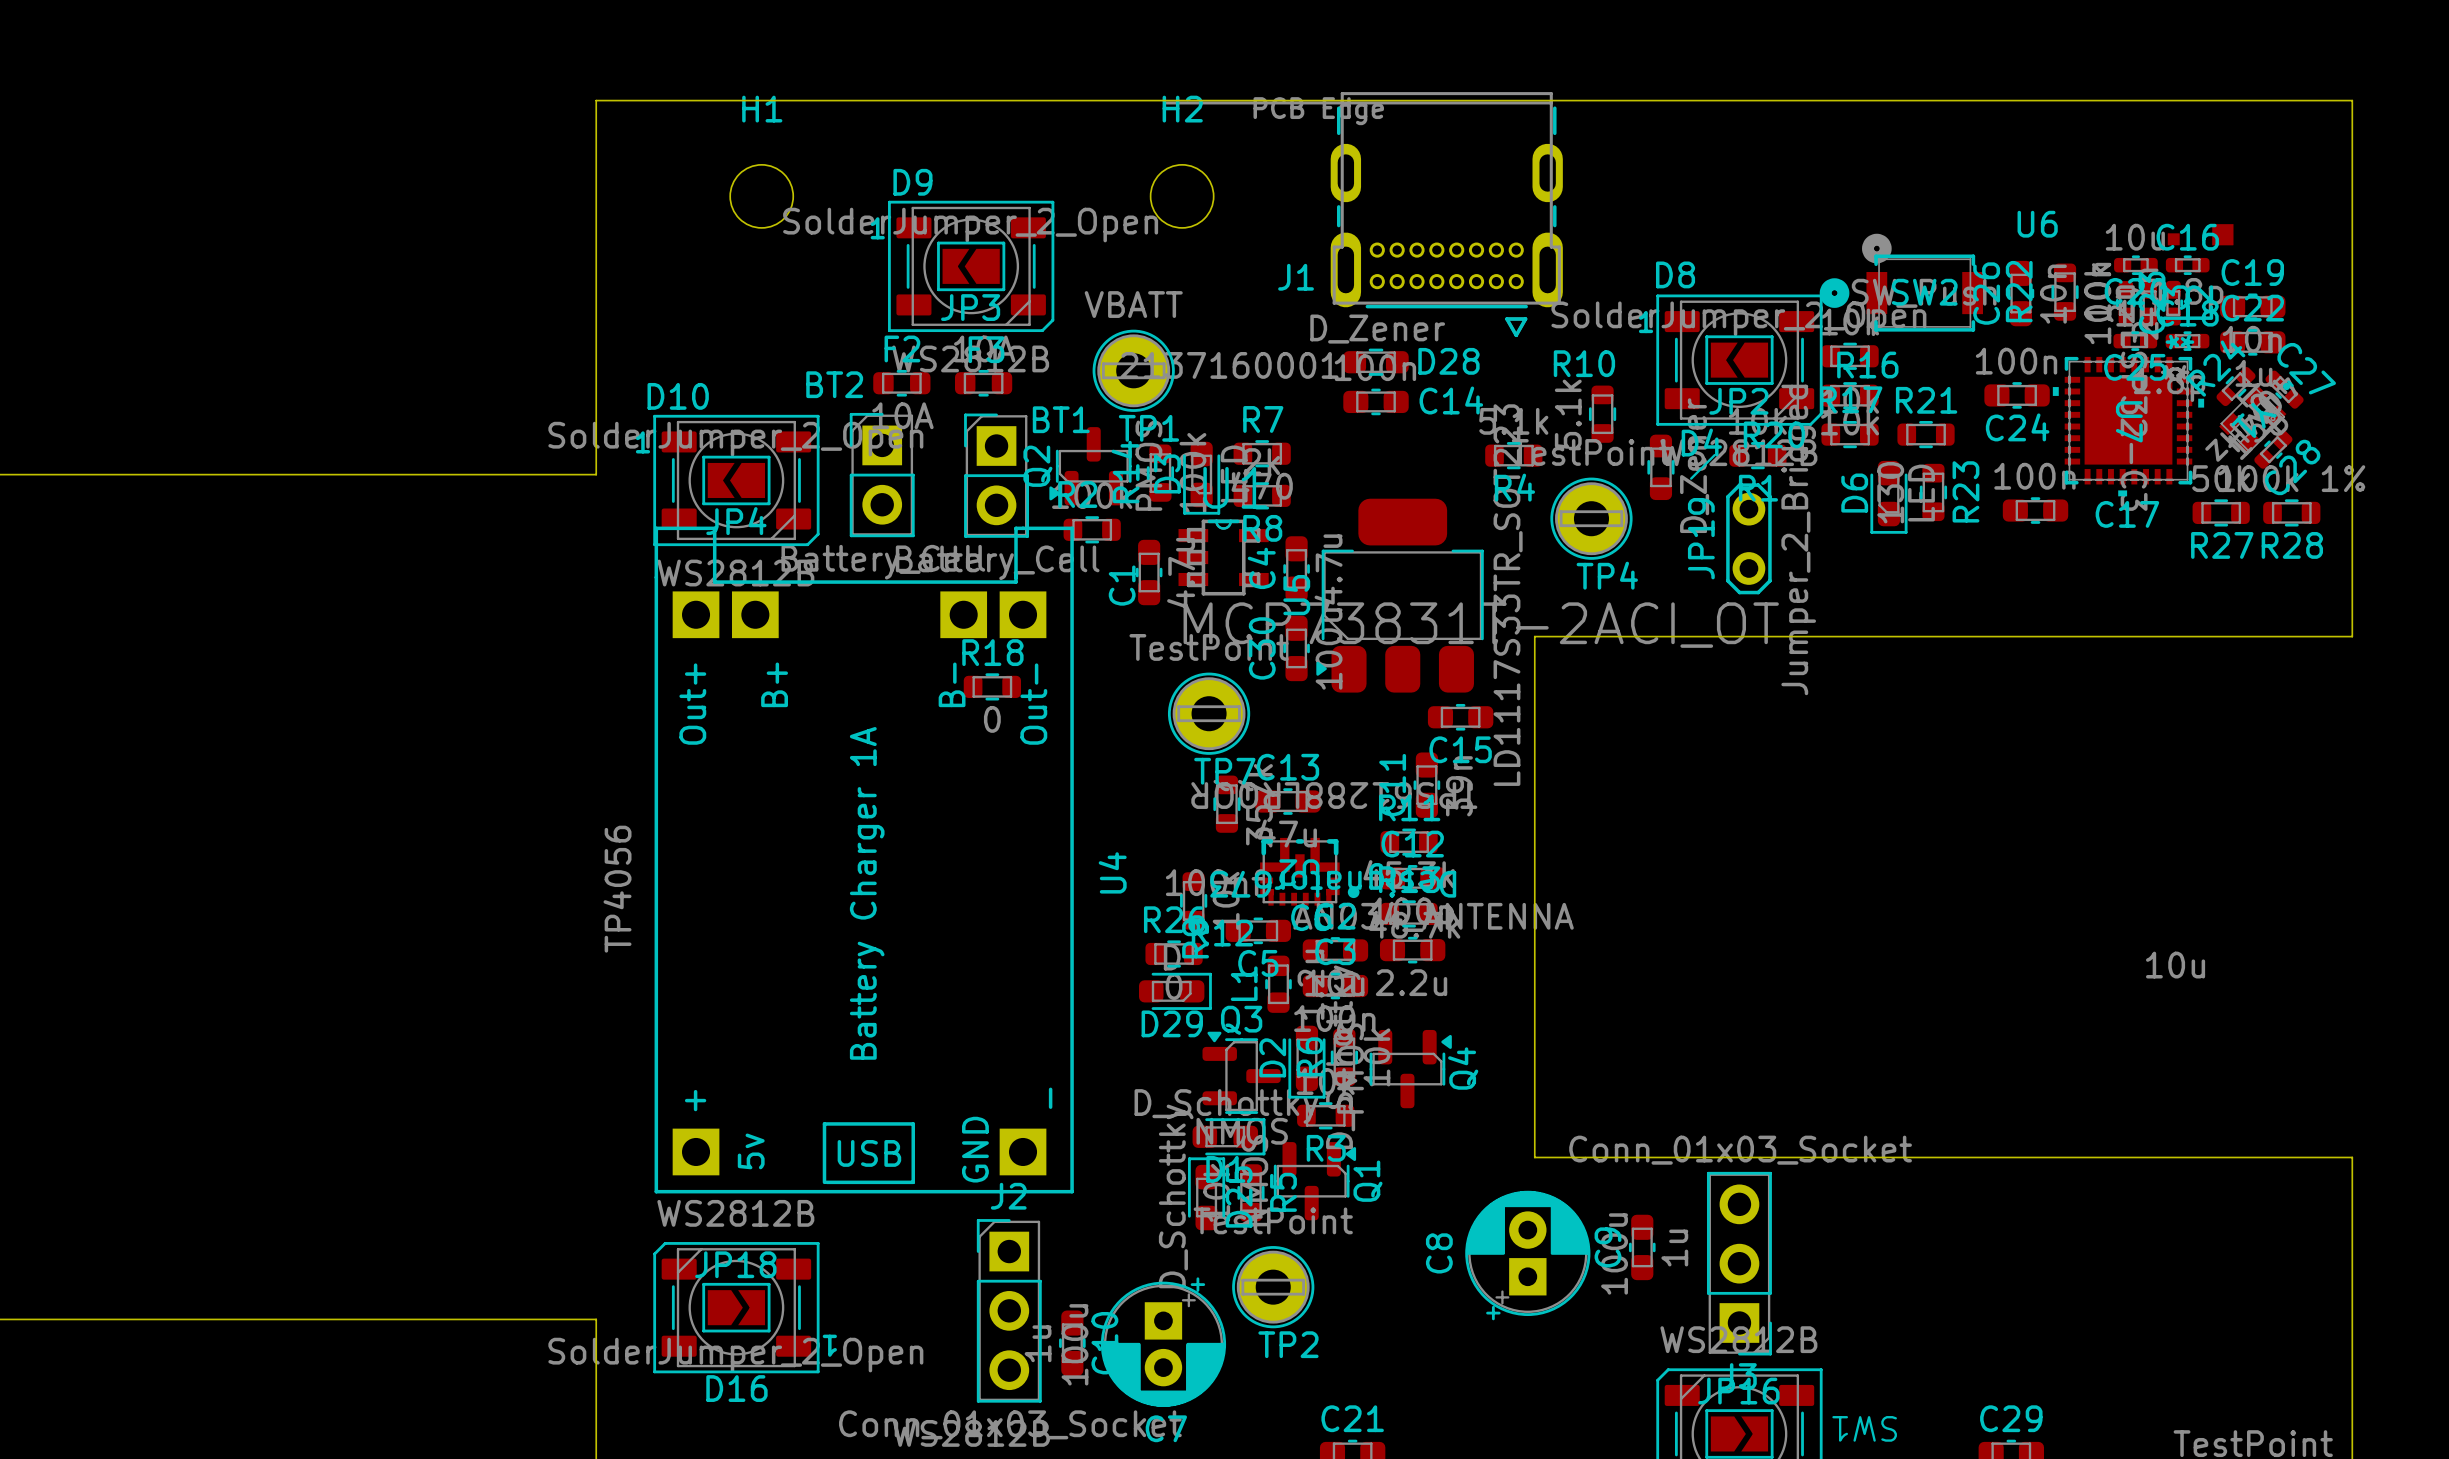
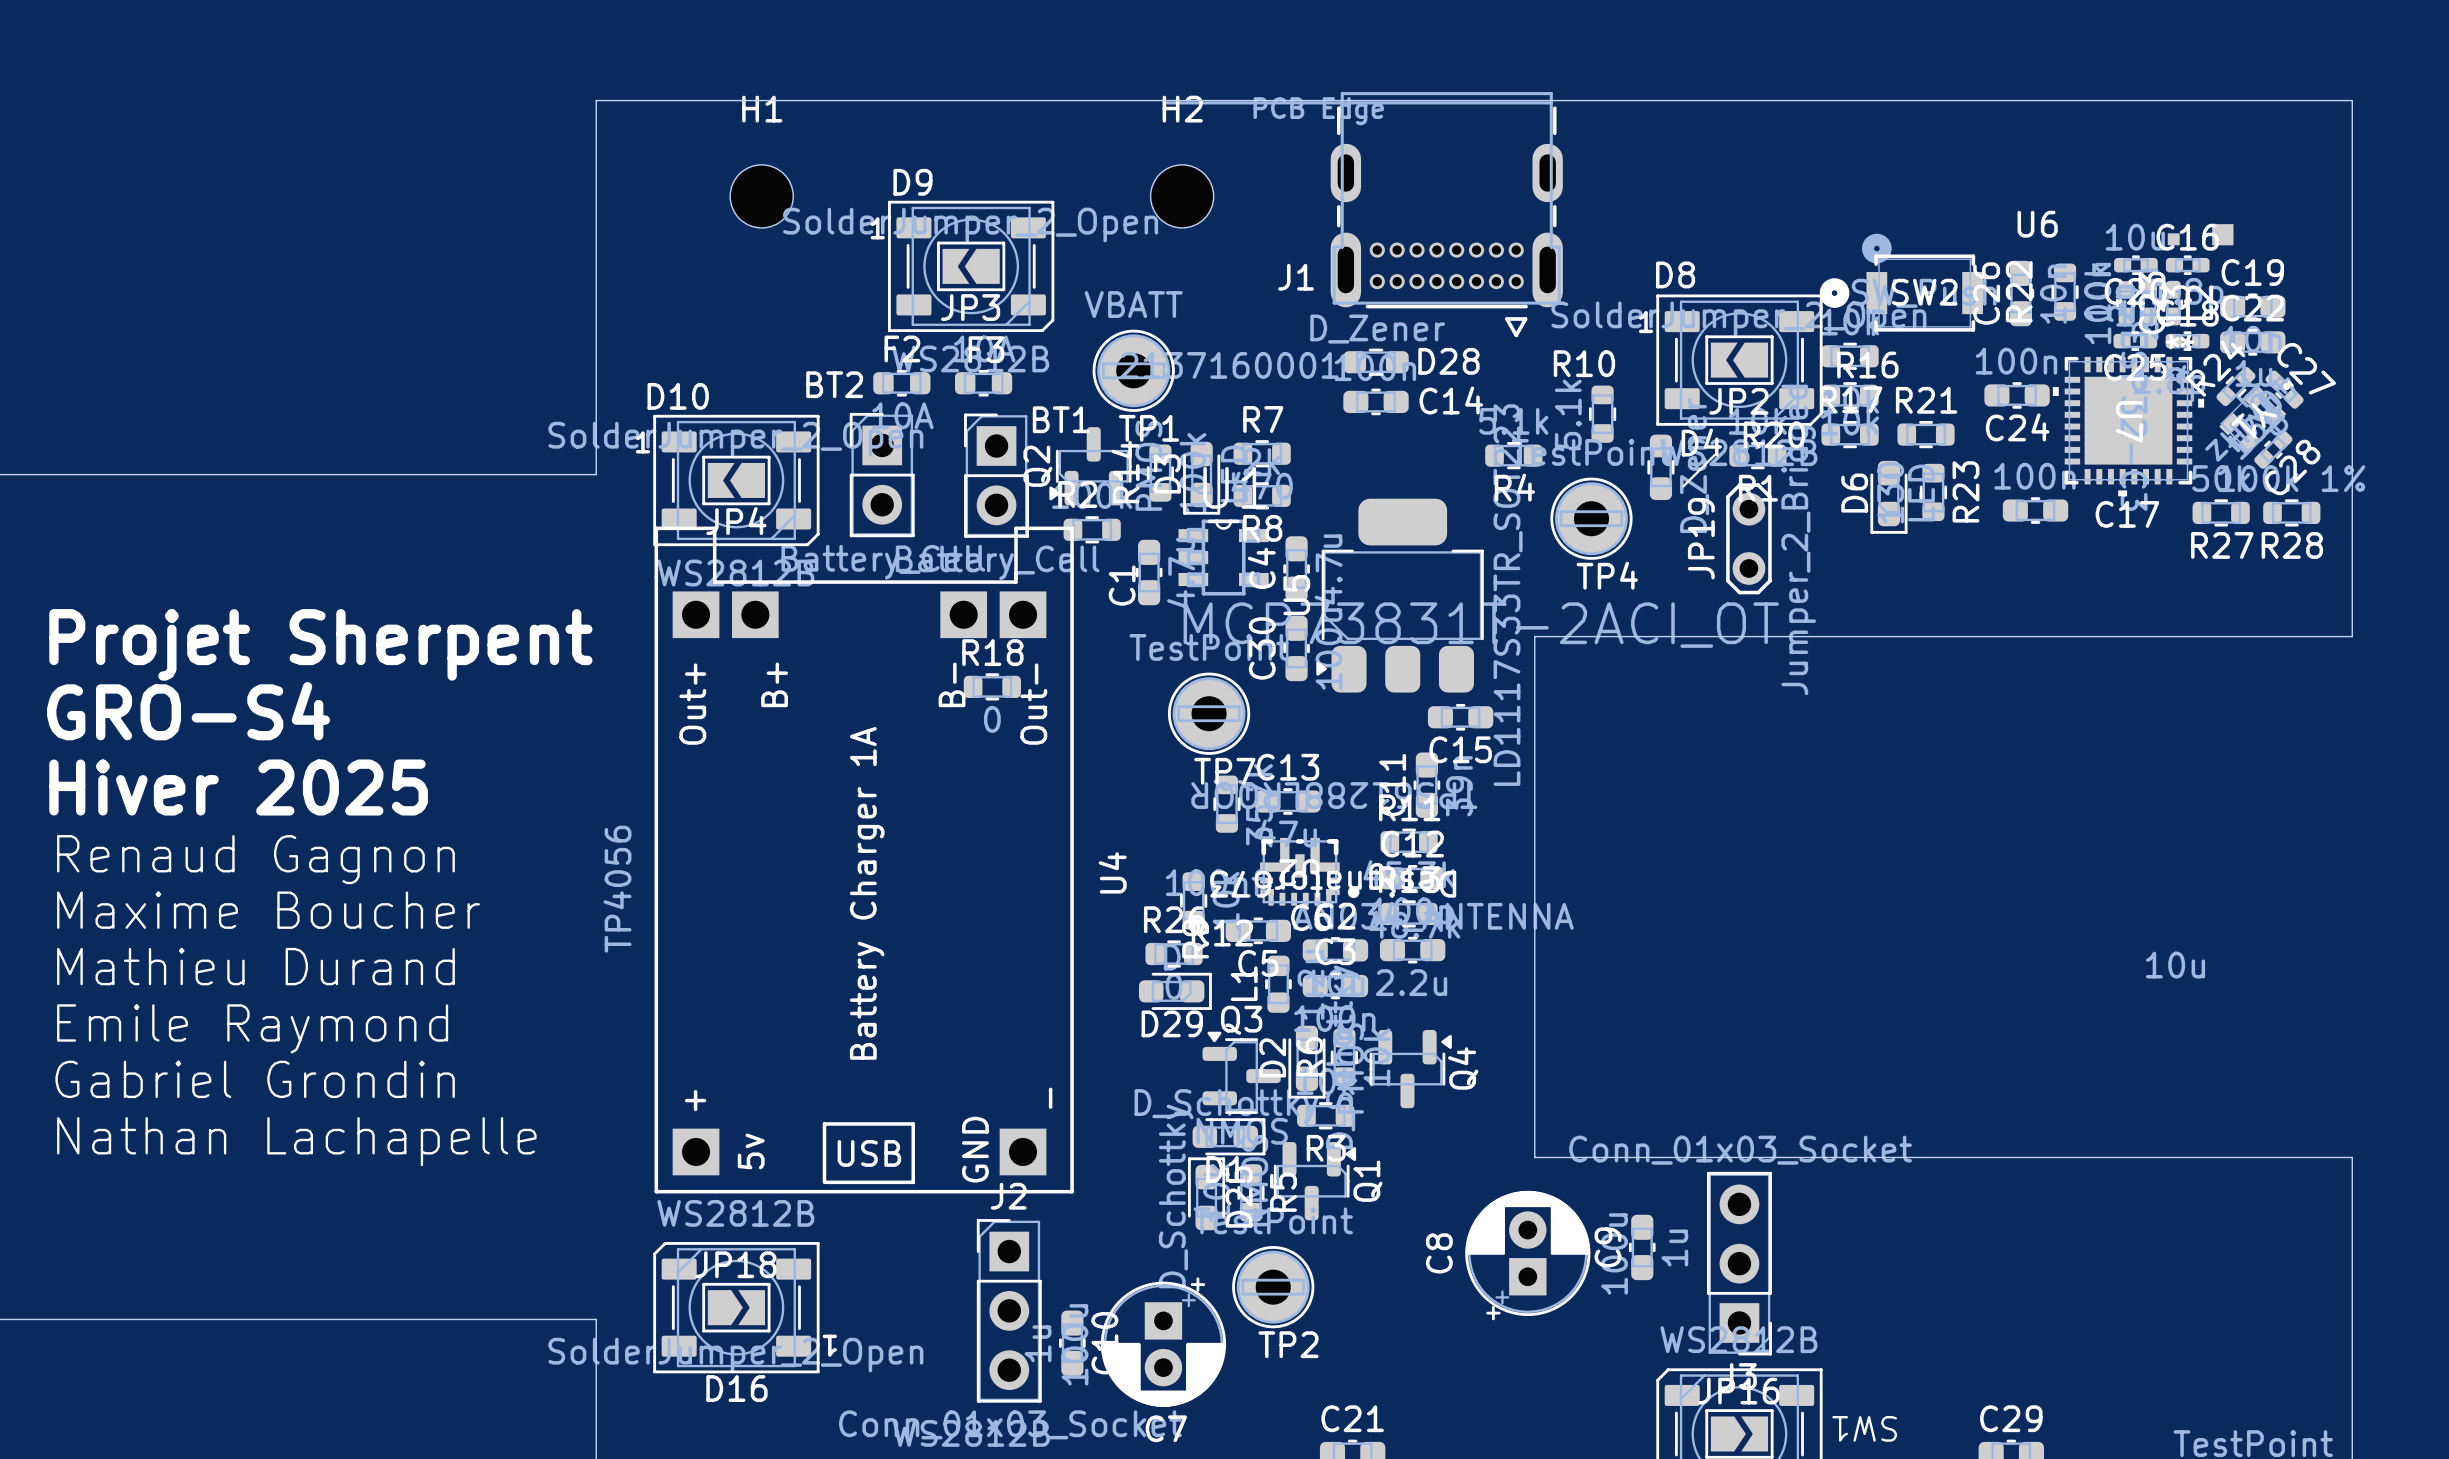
line: none -> (1691, 478) (1683, 486)
text: none -> Projet Sherpent (320, 644)
text: none -> GRO-S4 (188, 711)
text: none -> Hiver 2025 (238, 787)
text: none -> Renaud Gagnon (255, 859)
text: none -> Maxime Boucher (268, 910)
text: none -> Mathieu Durand (255, 966)
text: none -> Emile Raymond (252, 1028)
text: none -> Gabriel Grondin (255, 1079)
text: none -> Nathan Lachapelle (296, 1141)

